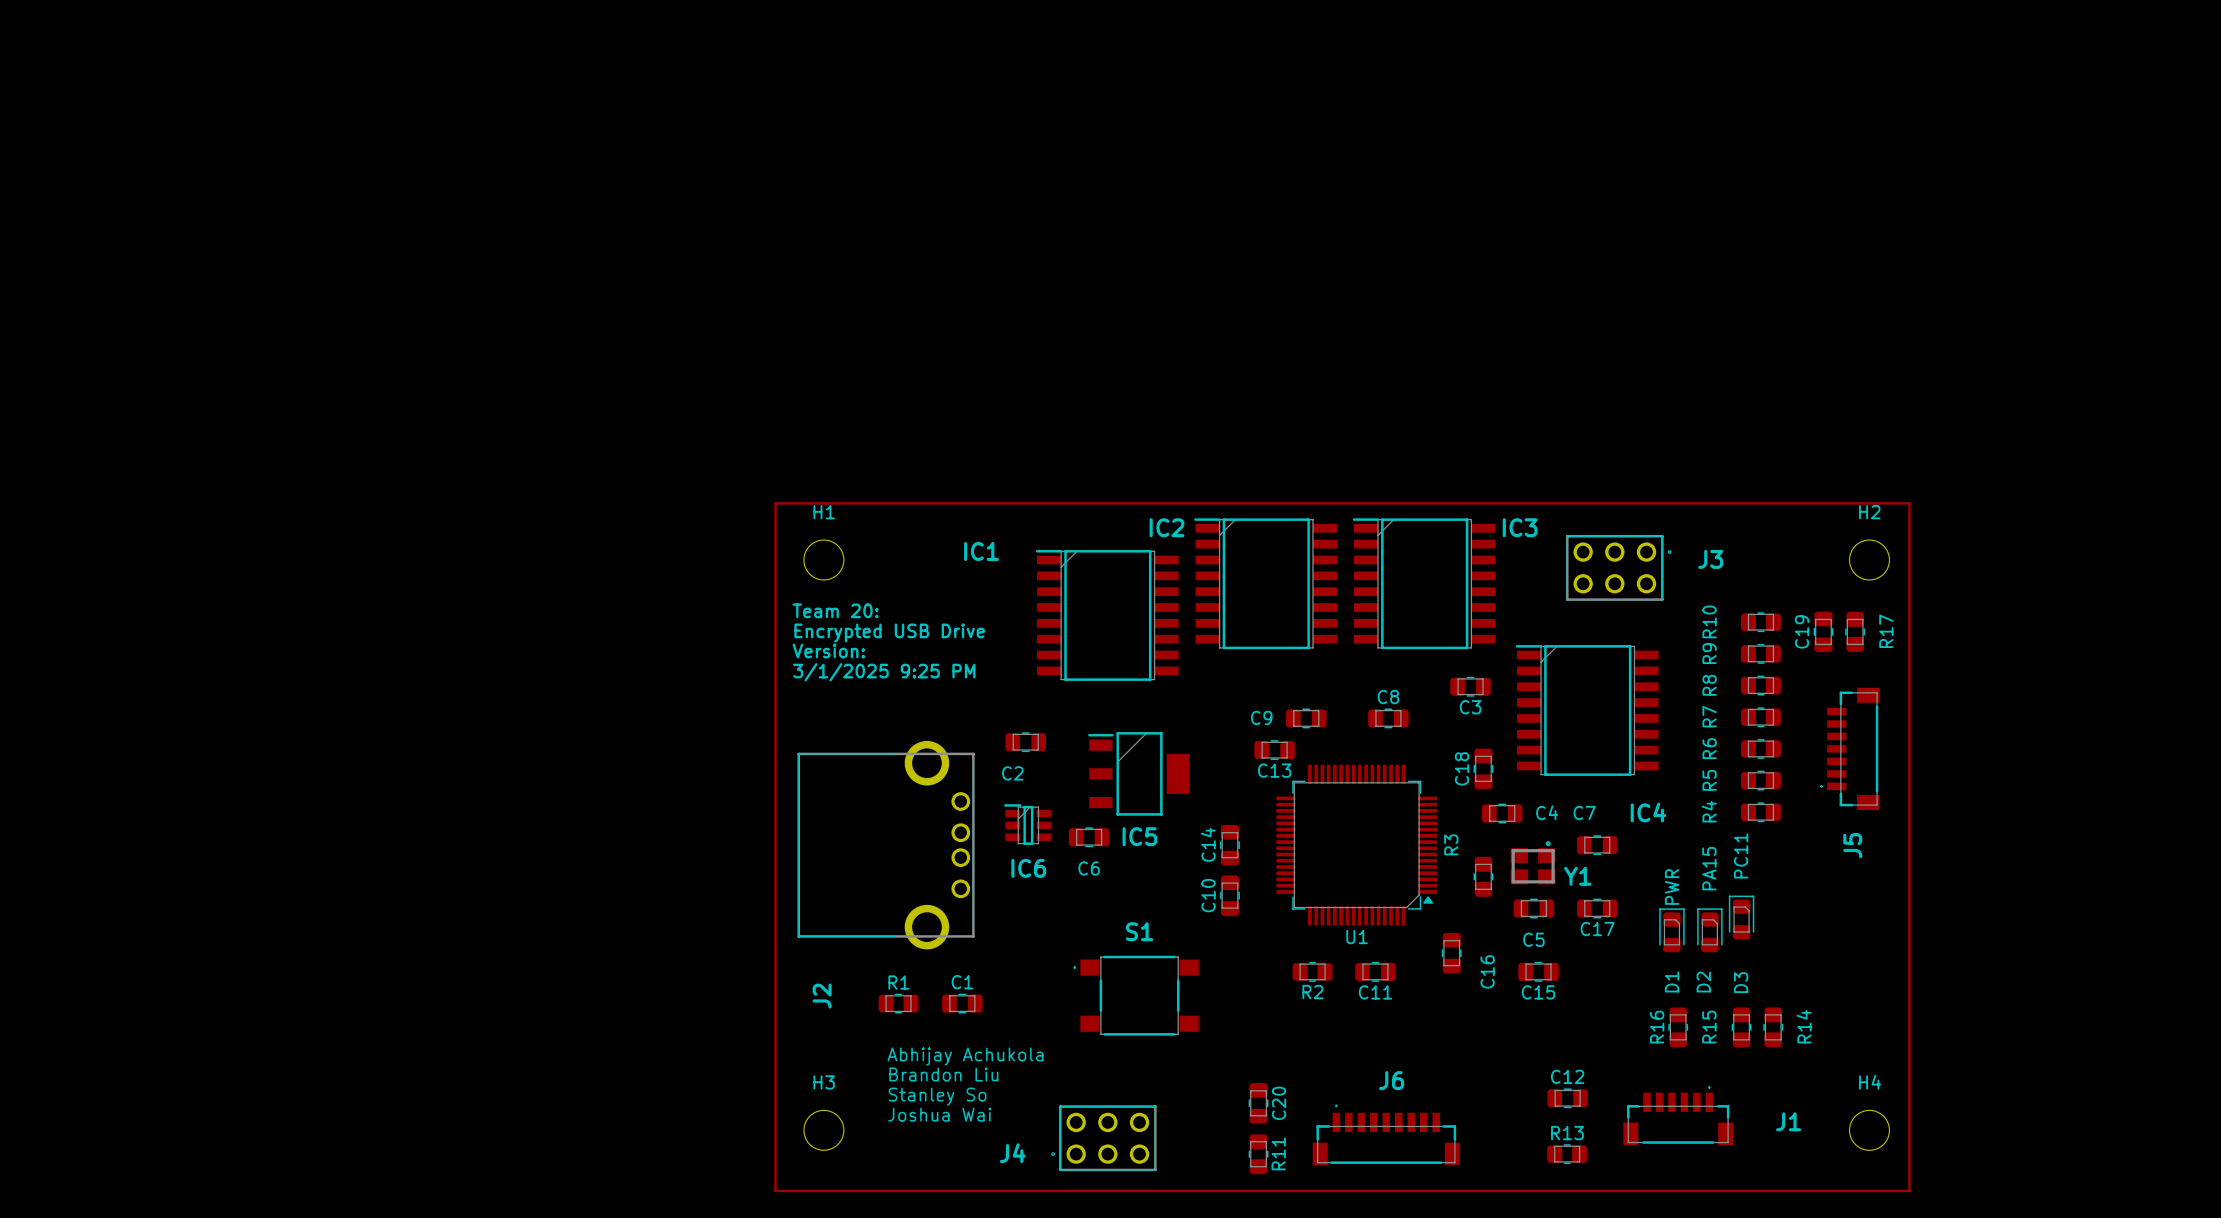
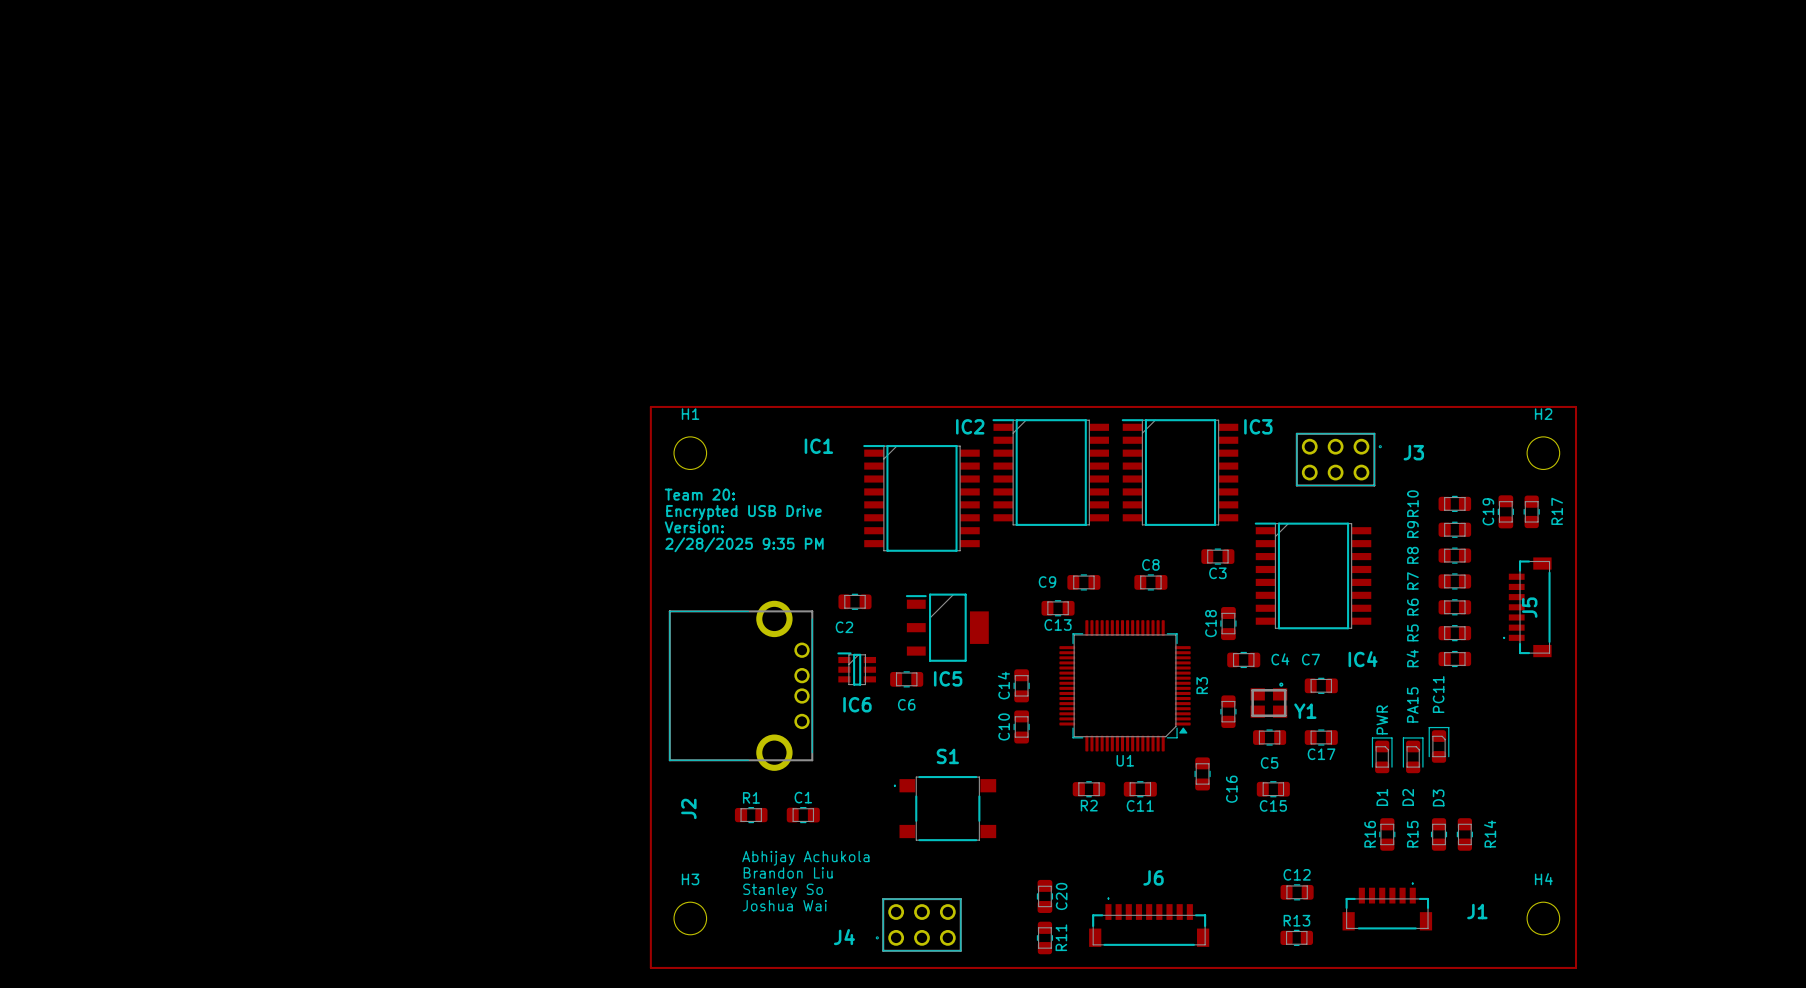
text: 3/1/2025 9:25 PM (884, 672) -> 2/28/2025 9:35 PM (744, 544)
J5 name position: J5 (1852, 845) -> J5 (1529, 607)

